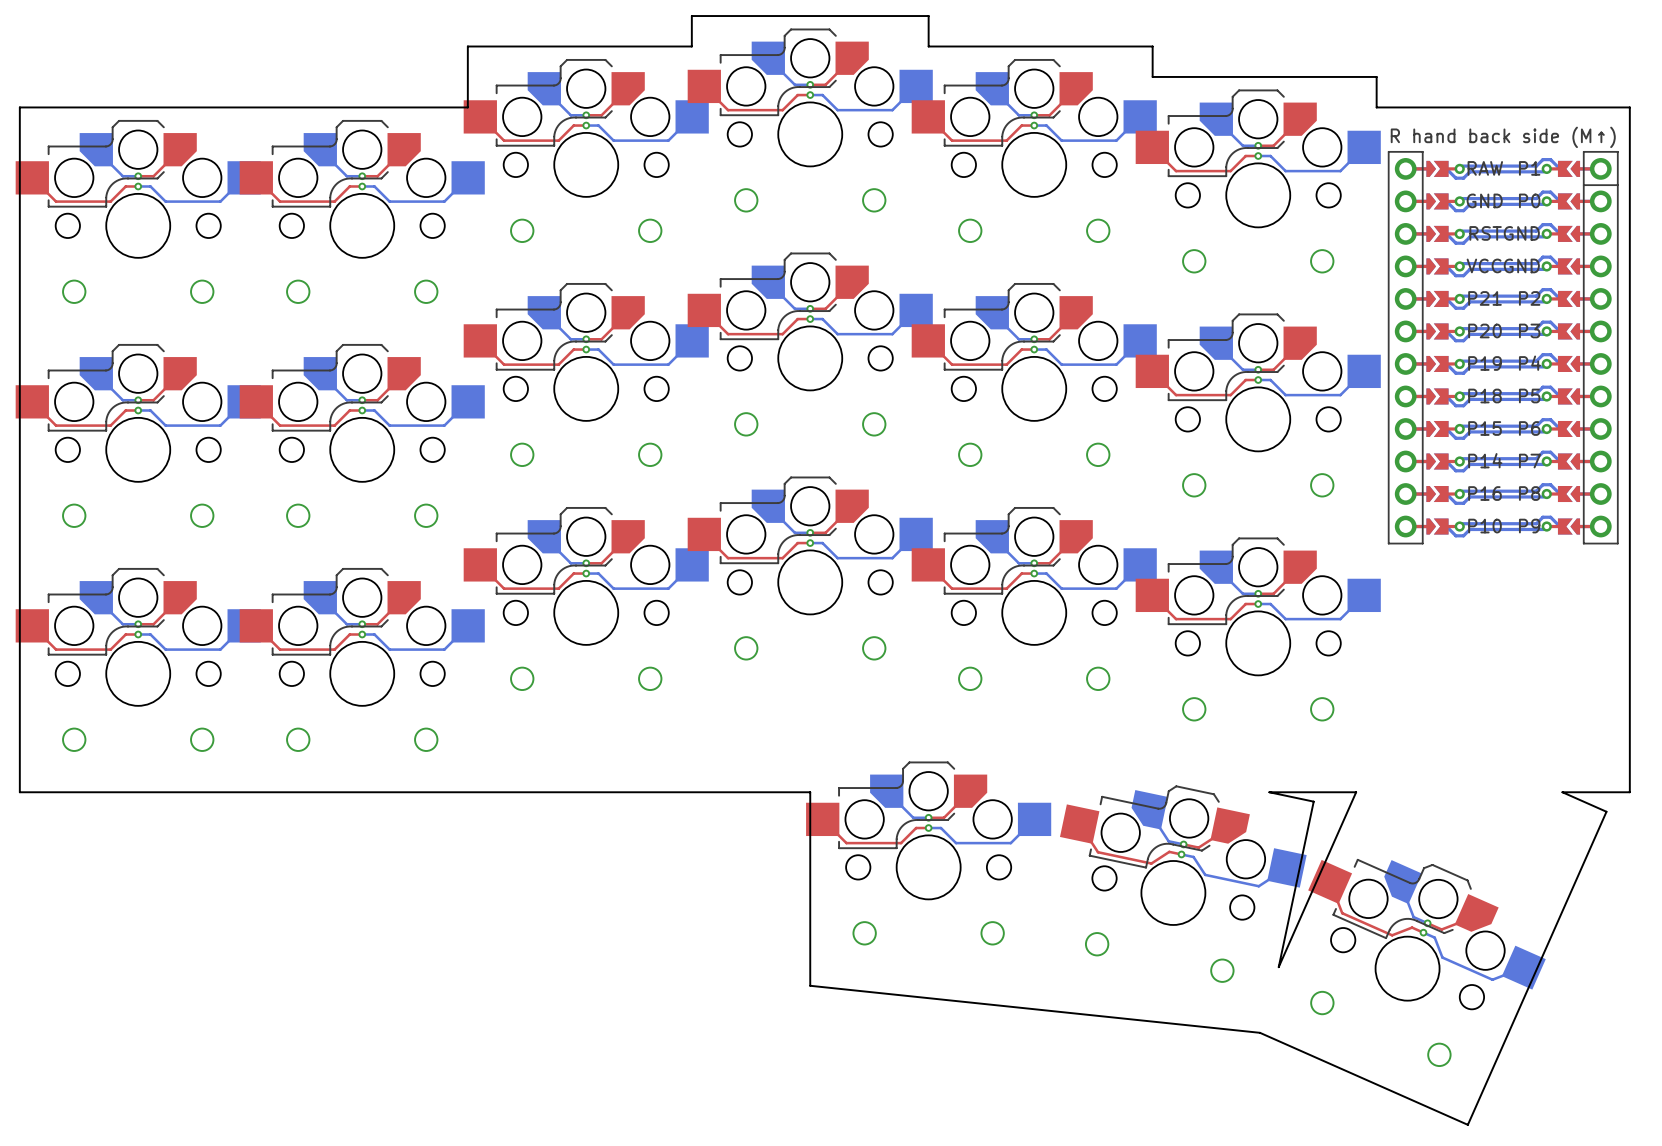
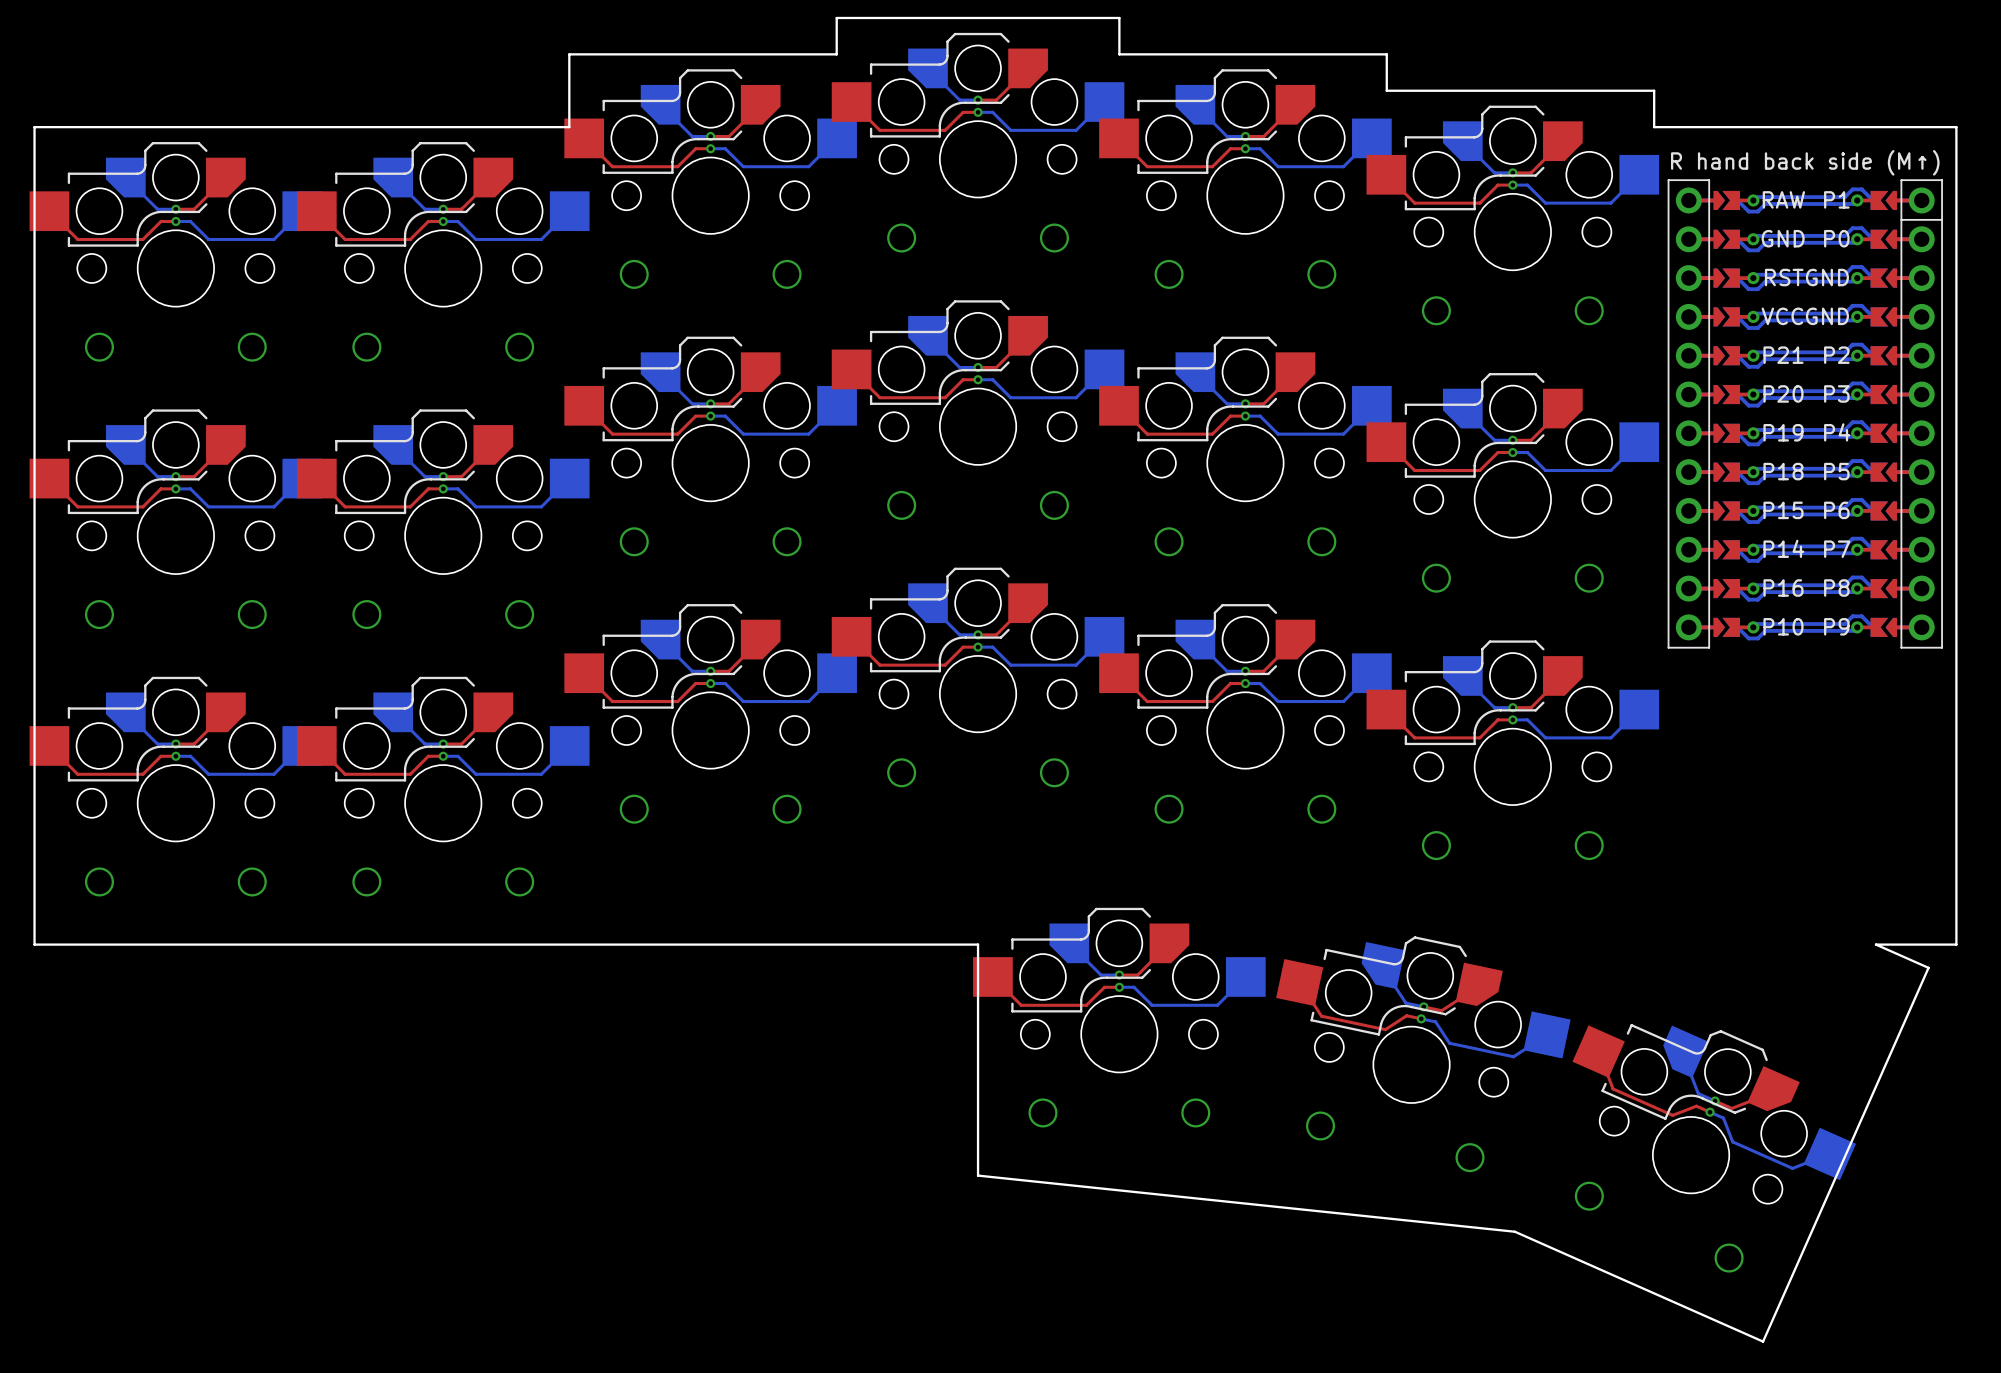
board edge: (1269, 792) (1356, 792) (1278, 967) (1313, 801) (1269, 792) -> none

